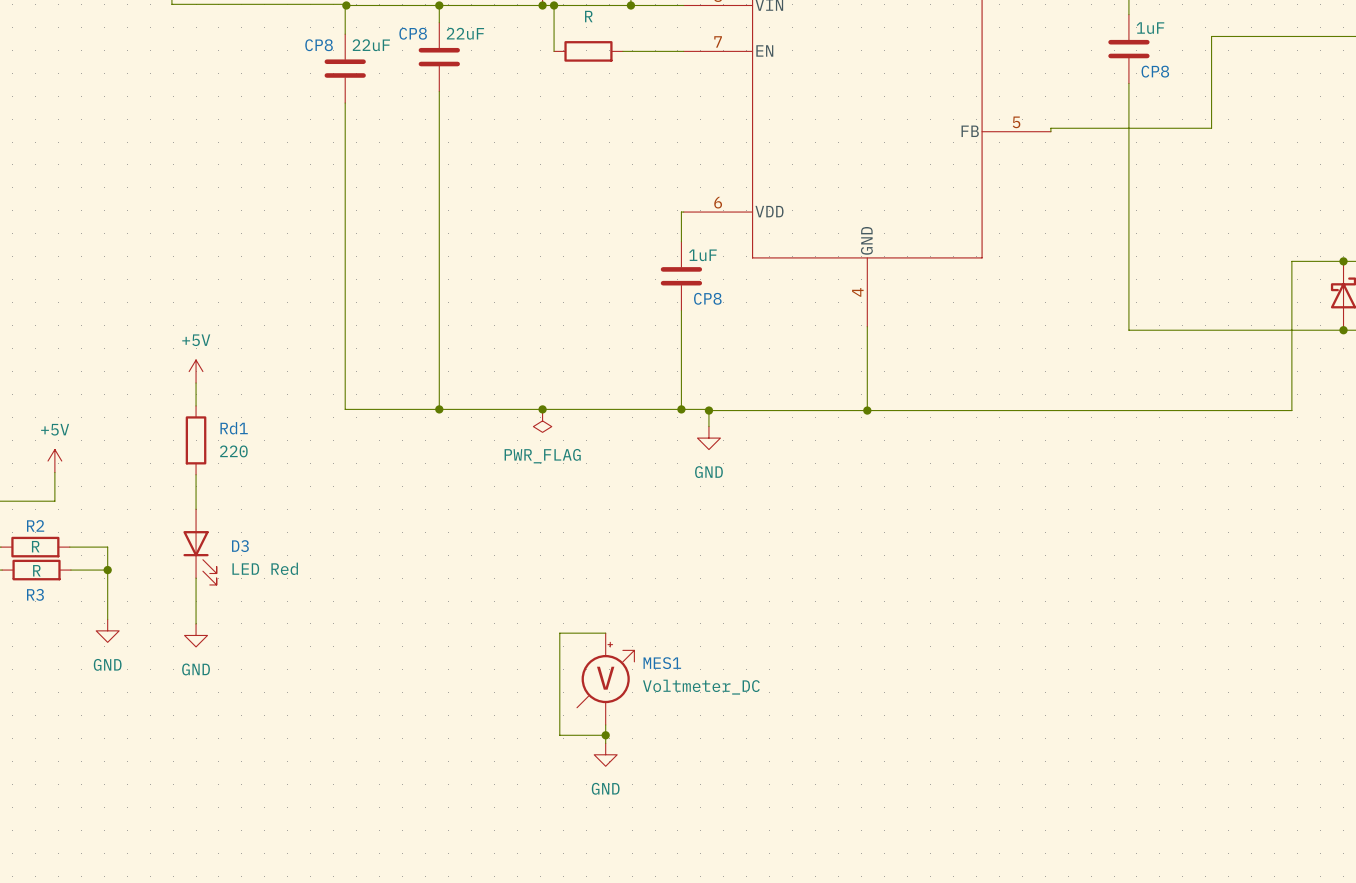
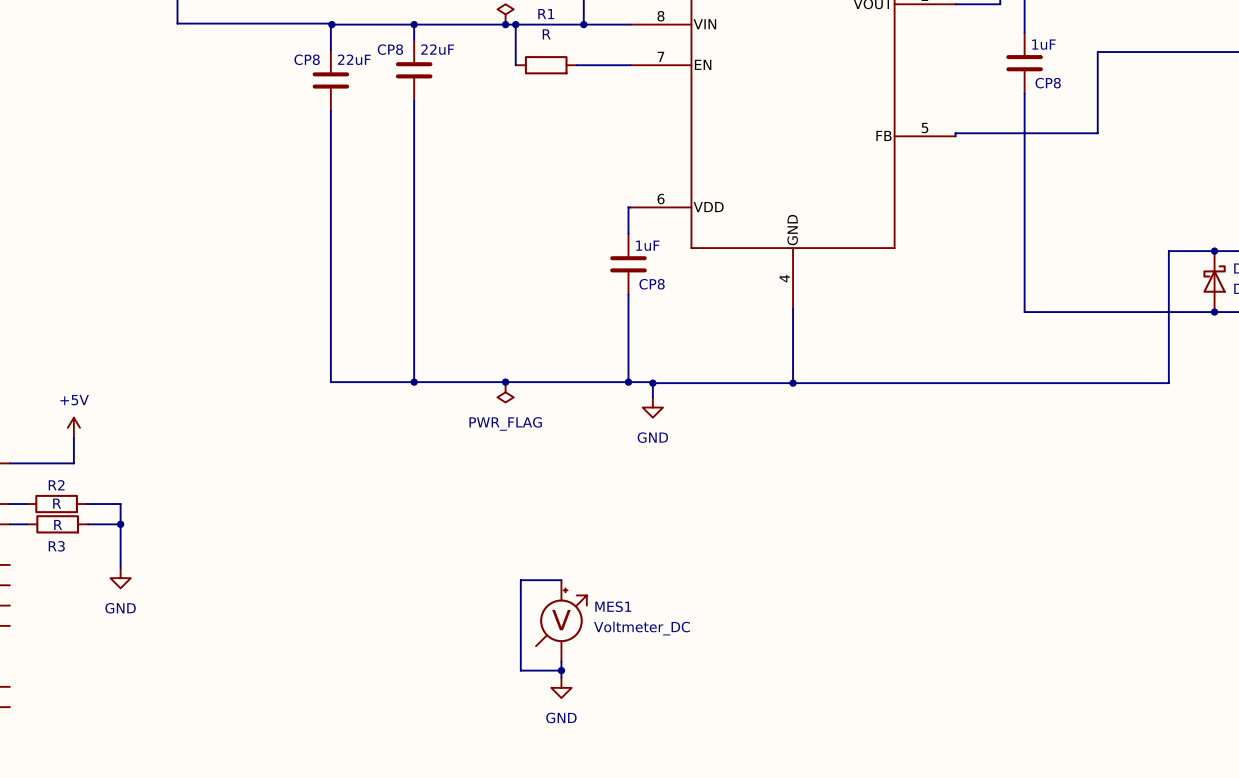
power symbol: +5V (196, 371) -> none
wire: (196, 383) (196, 405) -> none
Rd1: 220 (196, 440) -> none
wire: (196, 474) (196, 509) -> none
D3: LED Red (200, 547) -> none
wire: (196, 578) (196, 623) -> none
power symbol: GND (196, 635) -> none

